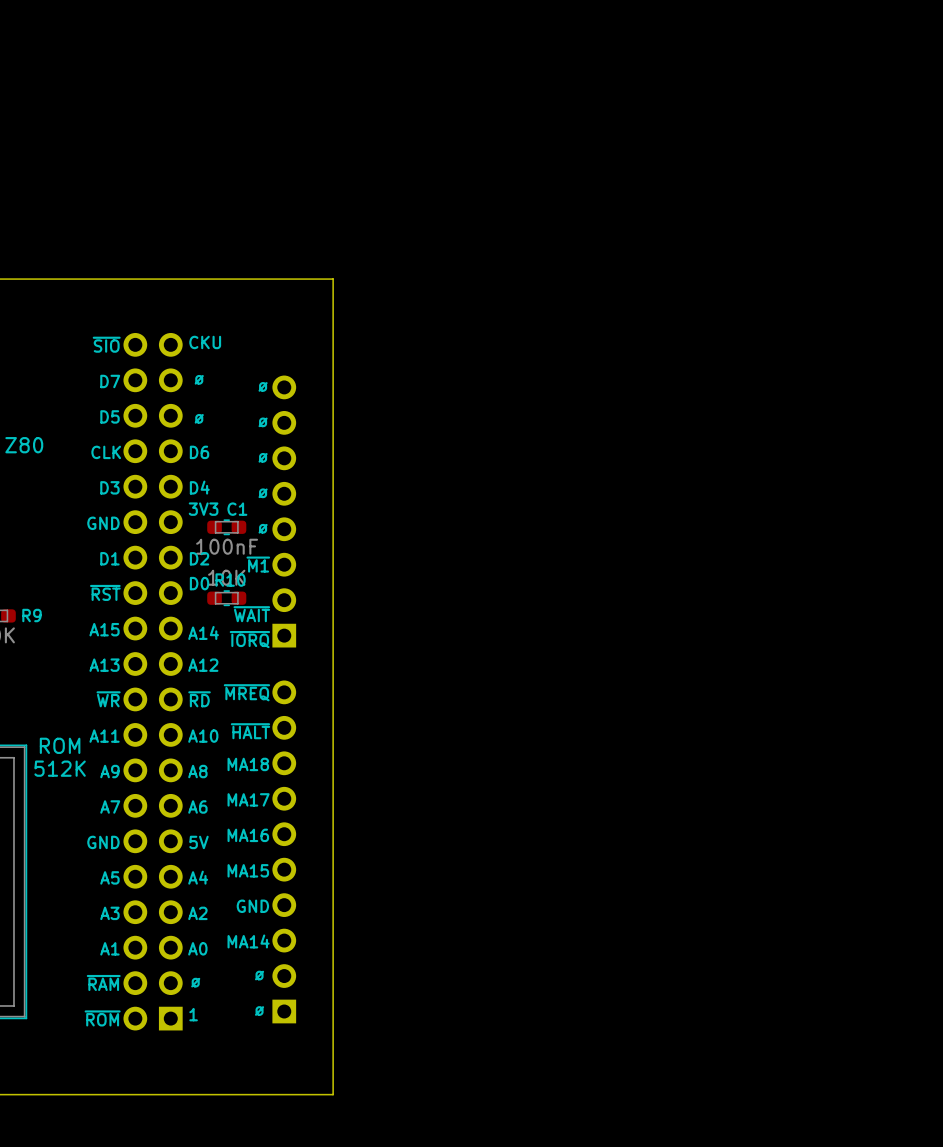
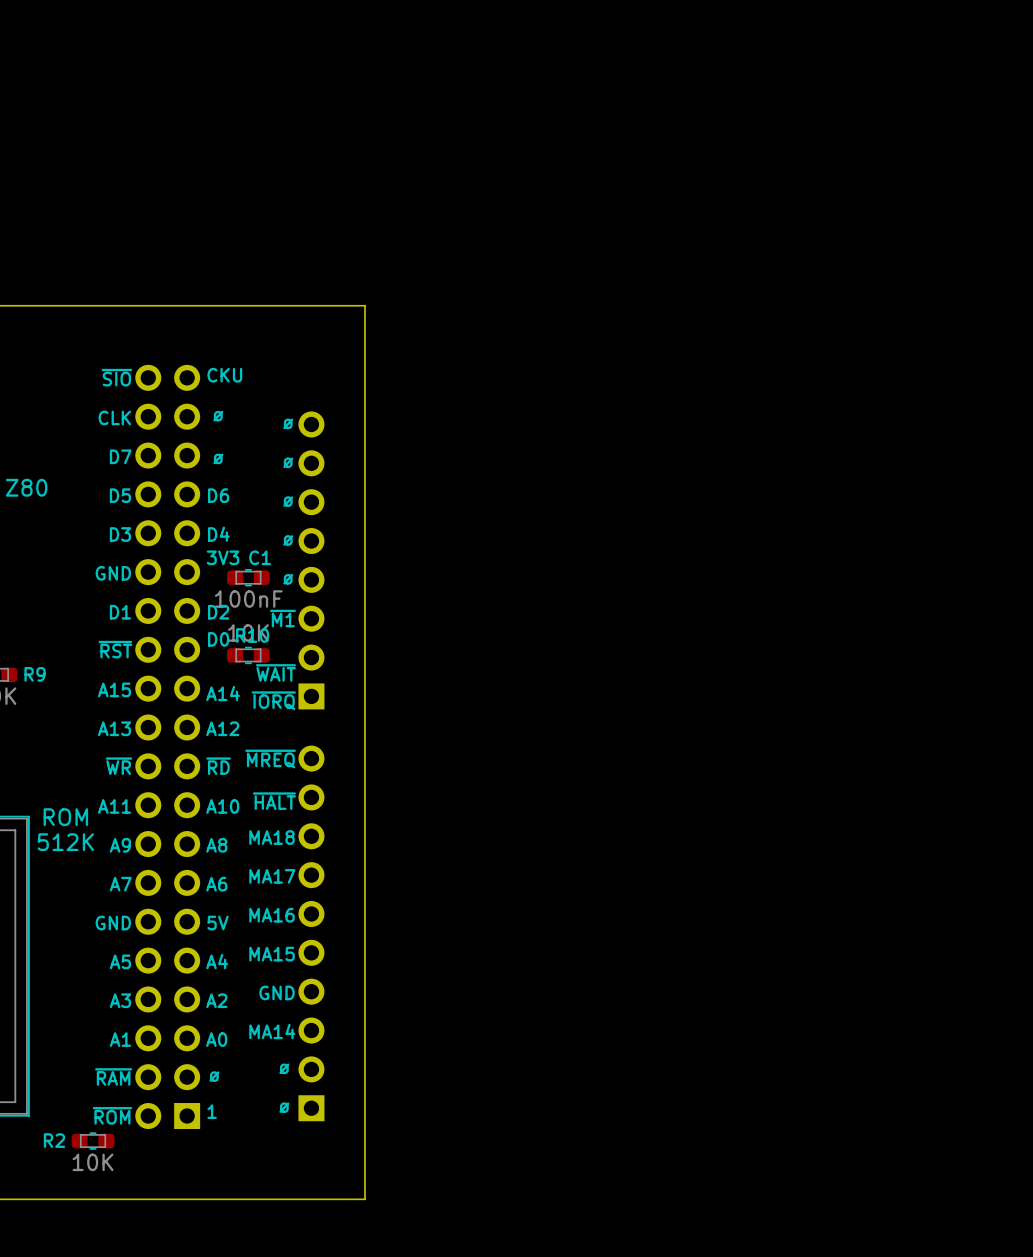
text: D7 (110, 381) -> CLK (114, 417)
text: D5 (110, 416) -> D7 (120, 456)
text: CLK (106, 452) -> D5 (120, 495)
R2: none -> 10K (93, 1141)

